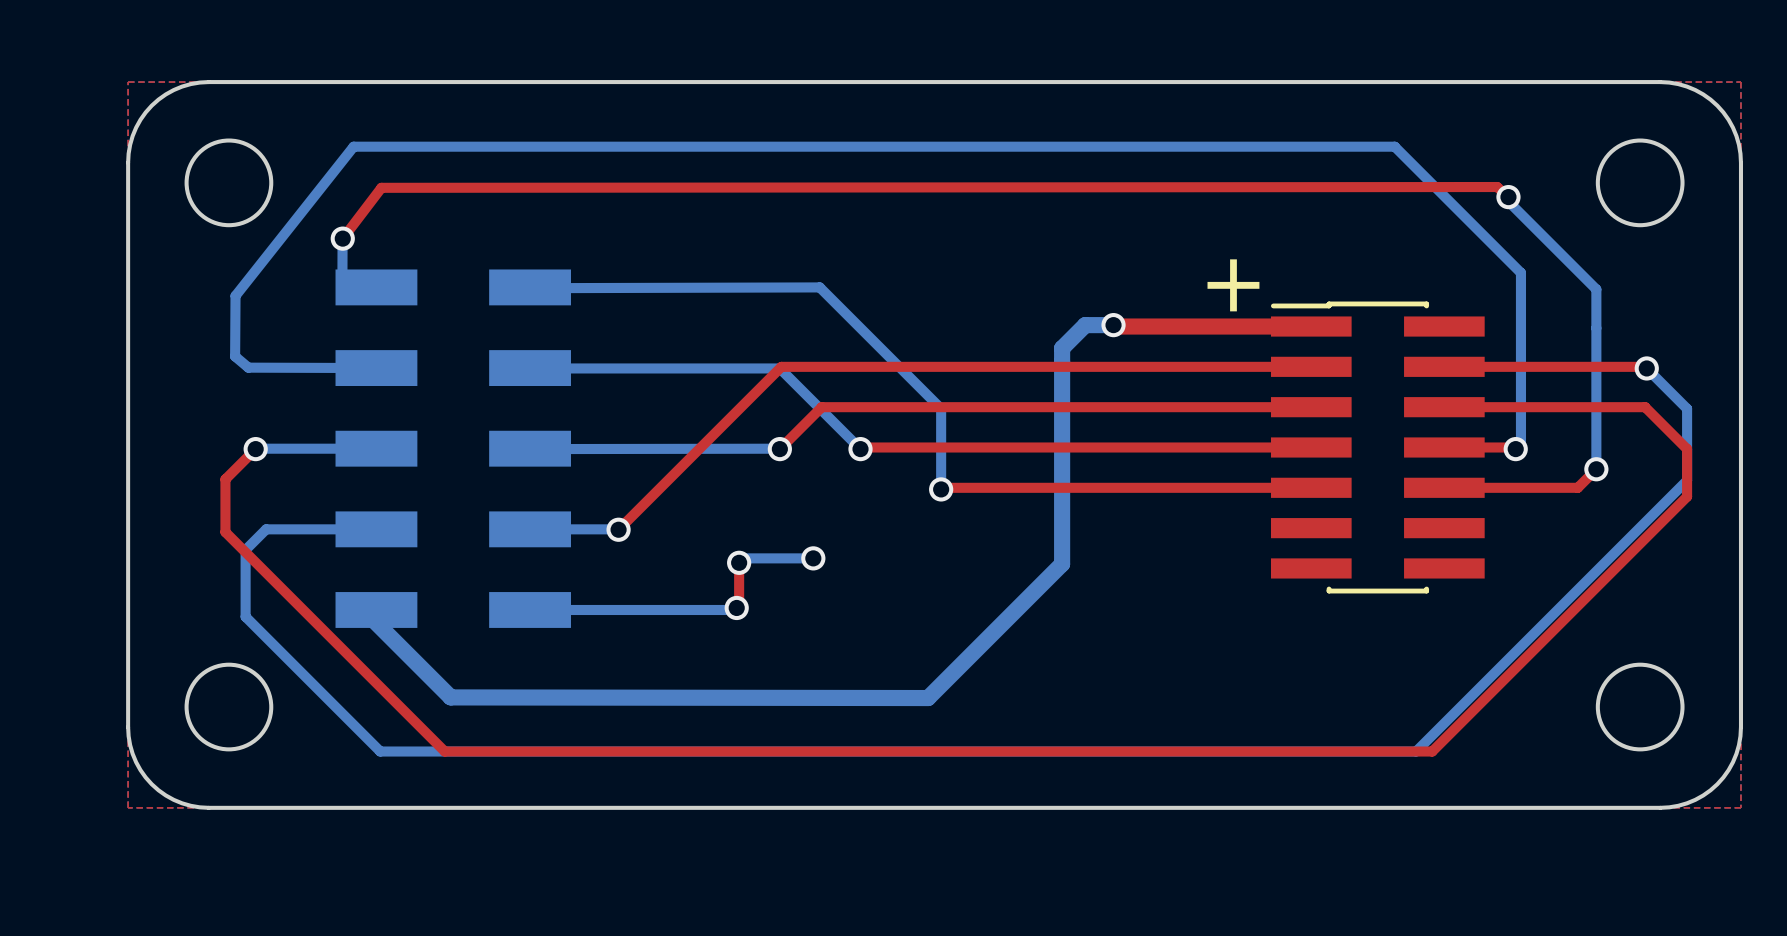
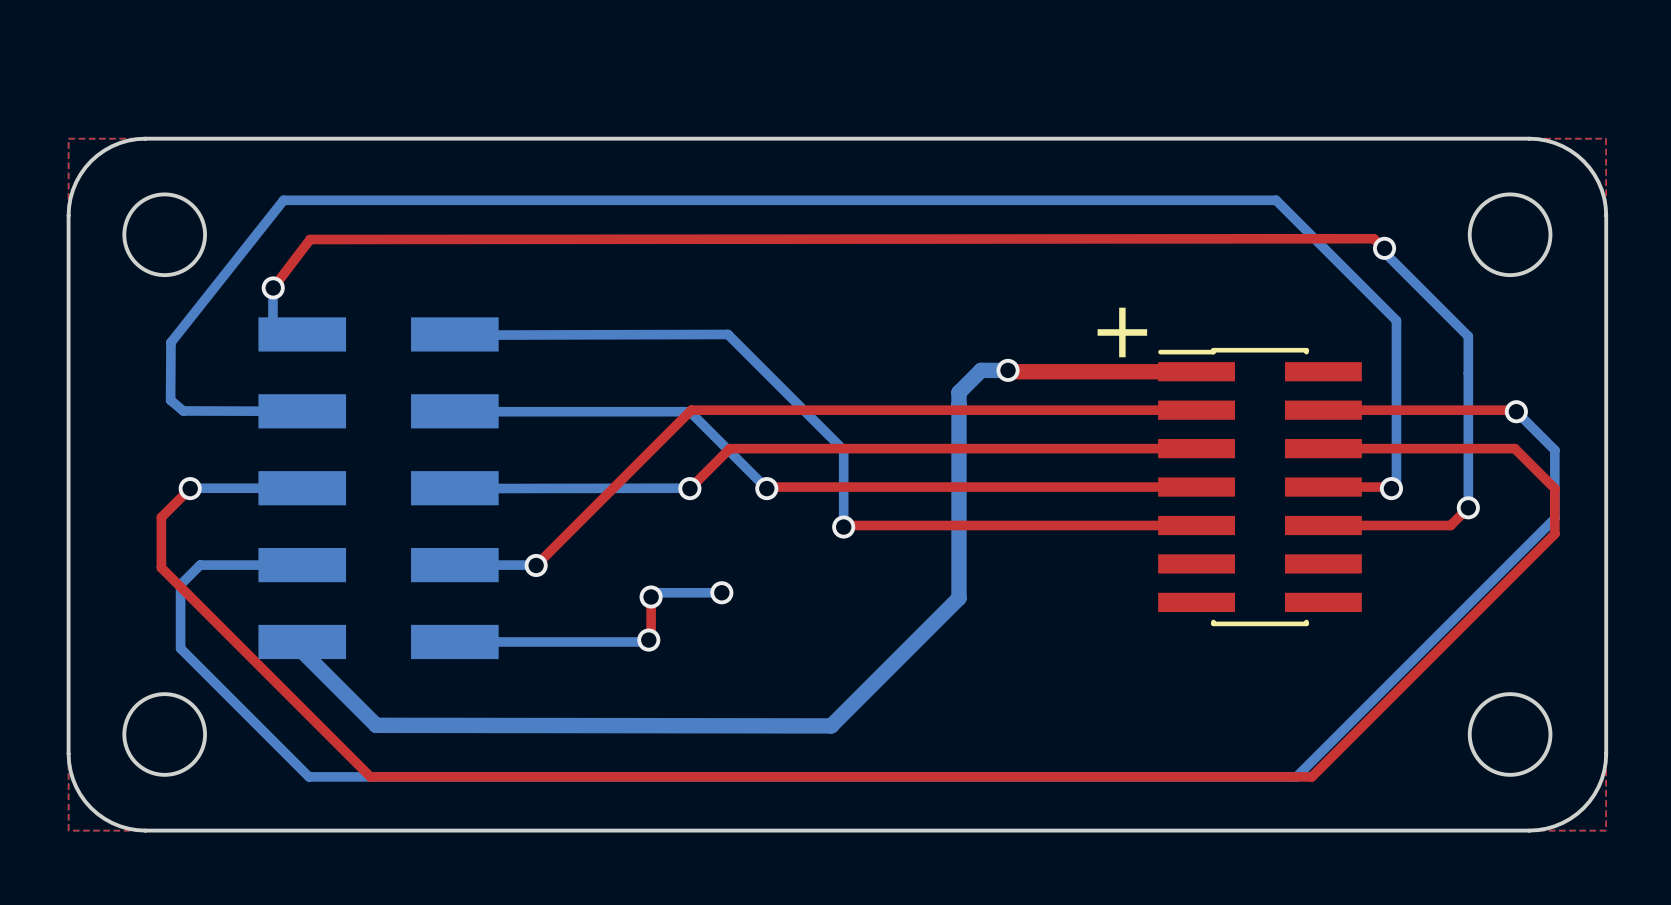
part footprint: [335, 269, 571, 628] -> [258, 317, 499, 660]

